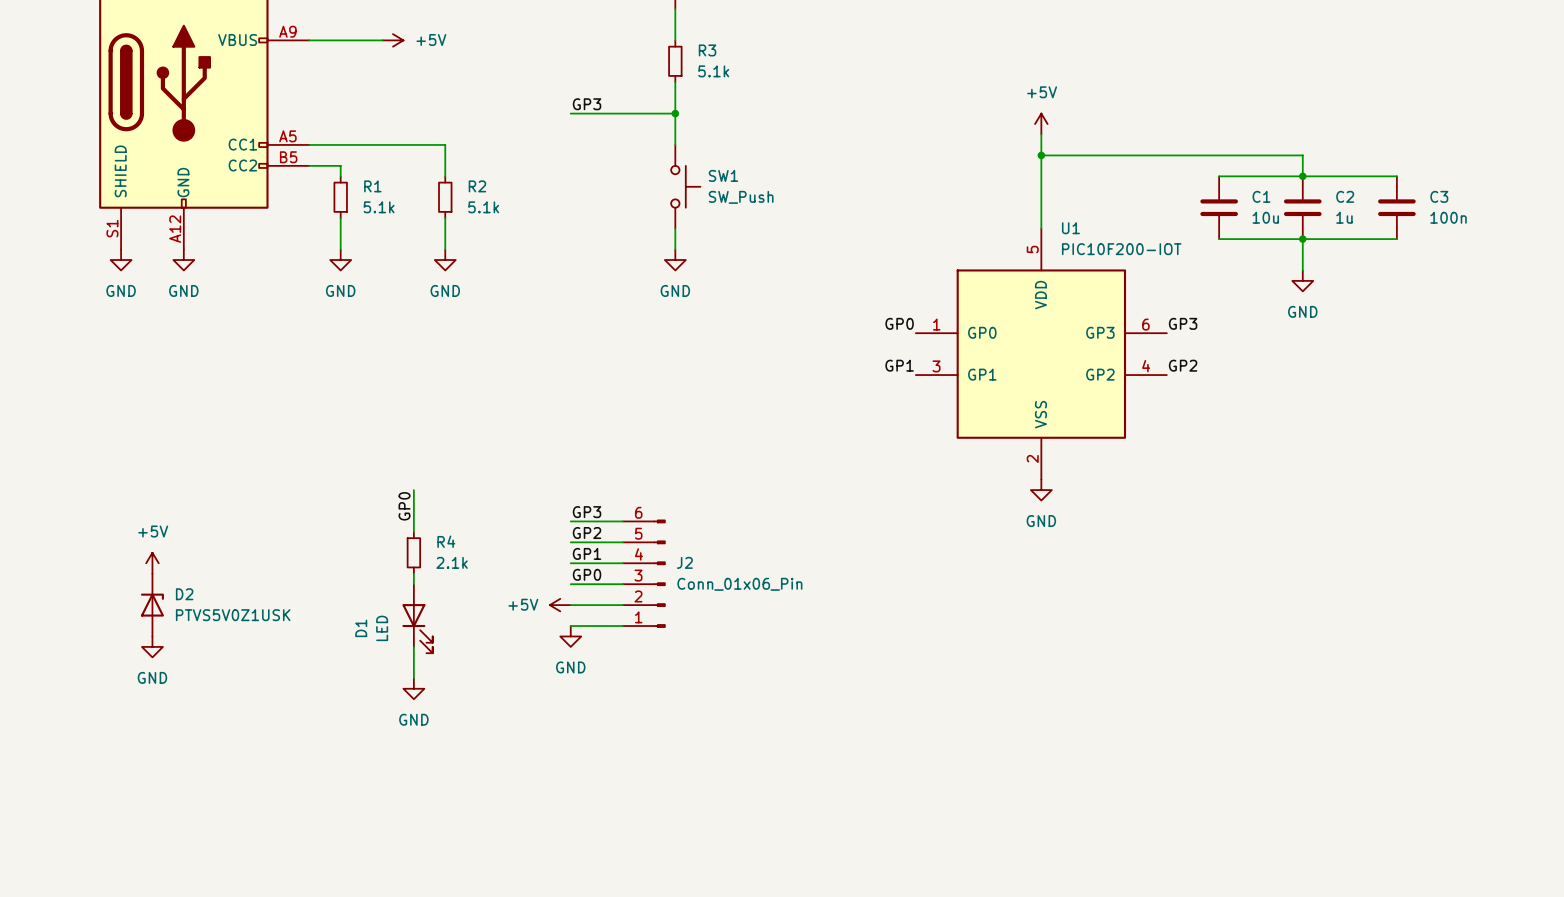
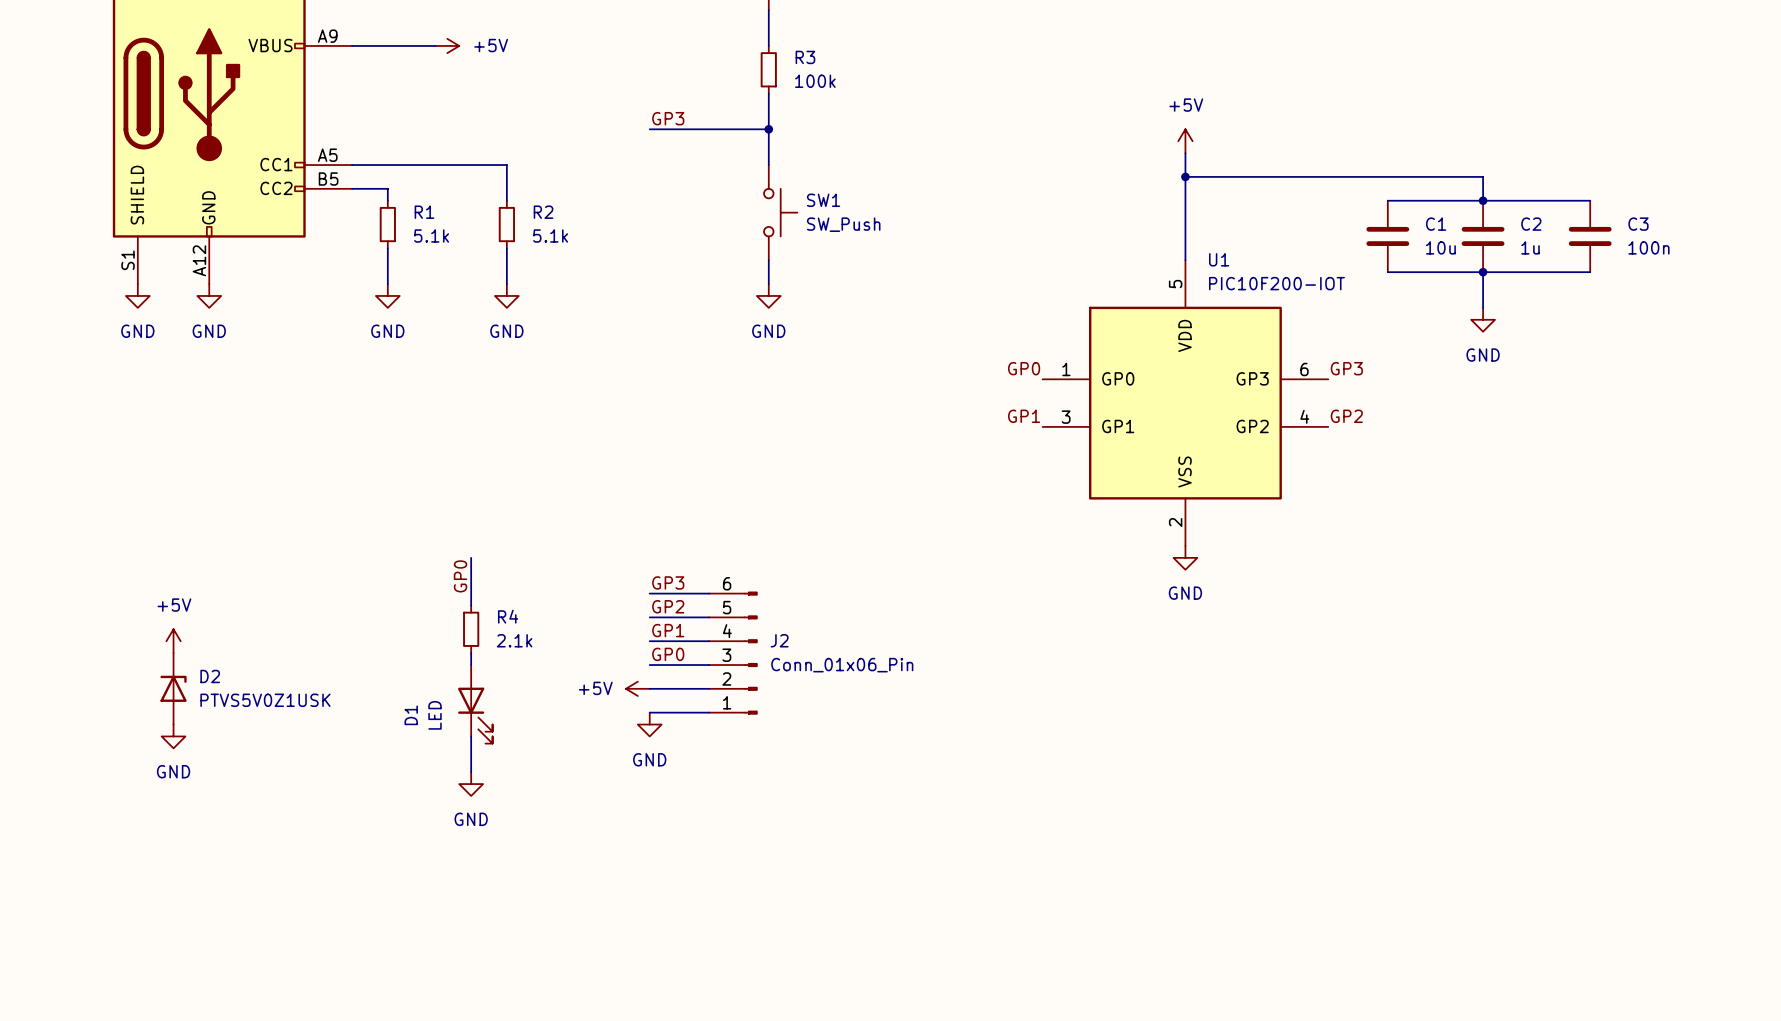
R3 value: 5.1k (713, 71) -> 100k (815, 81)

